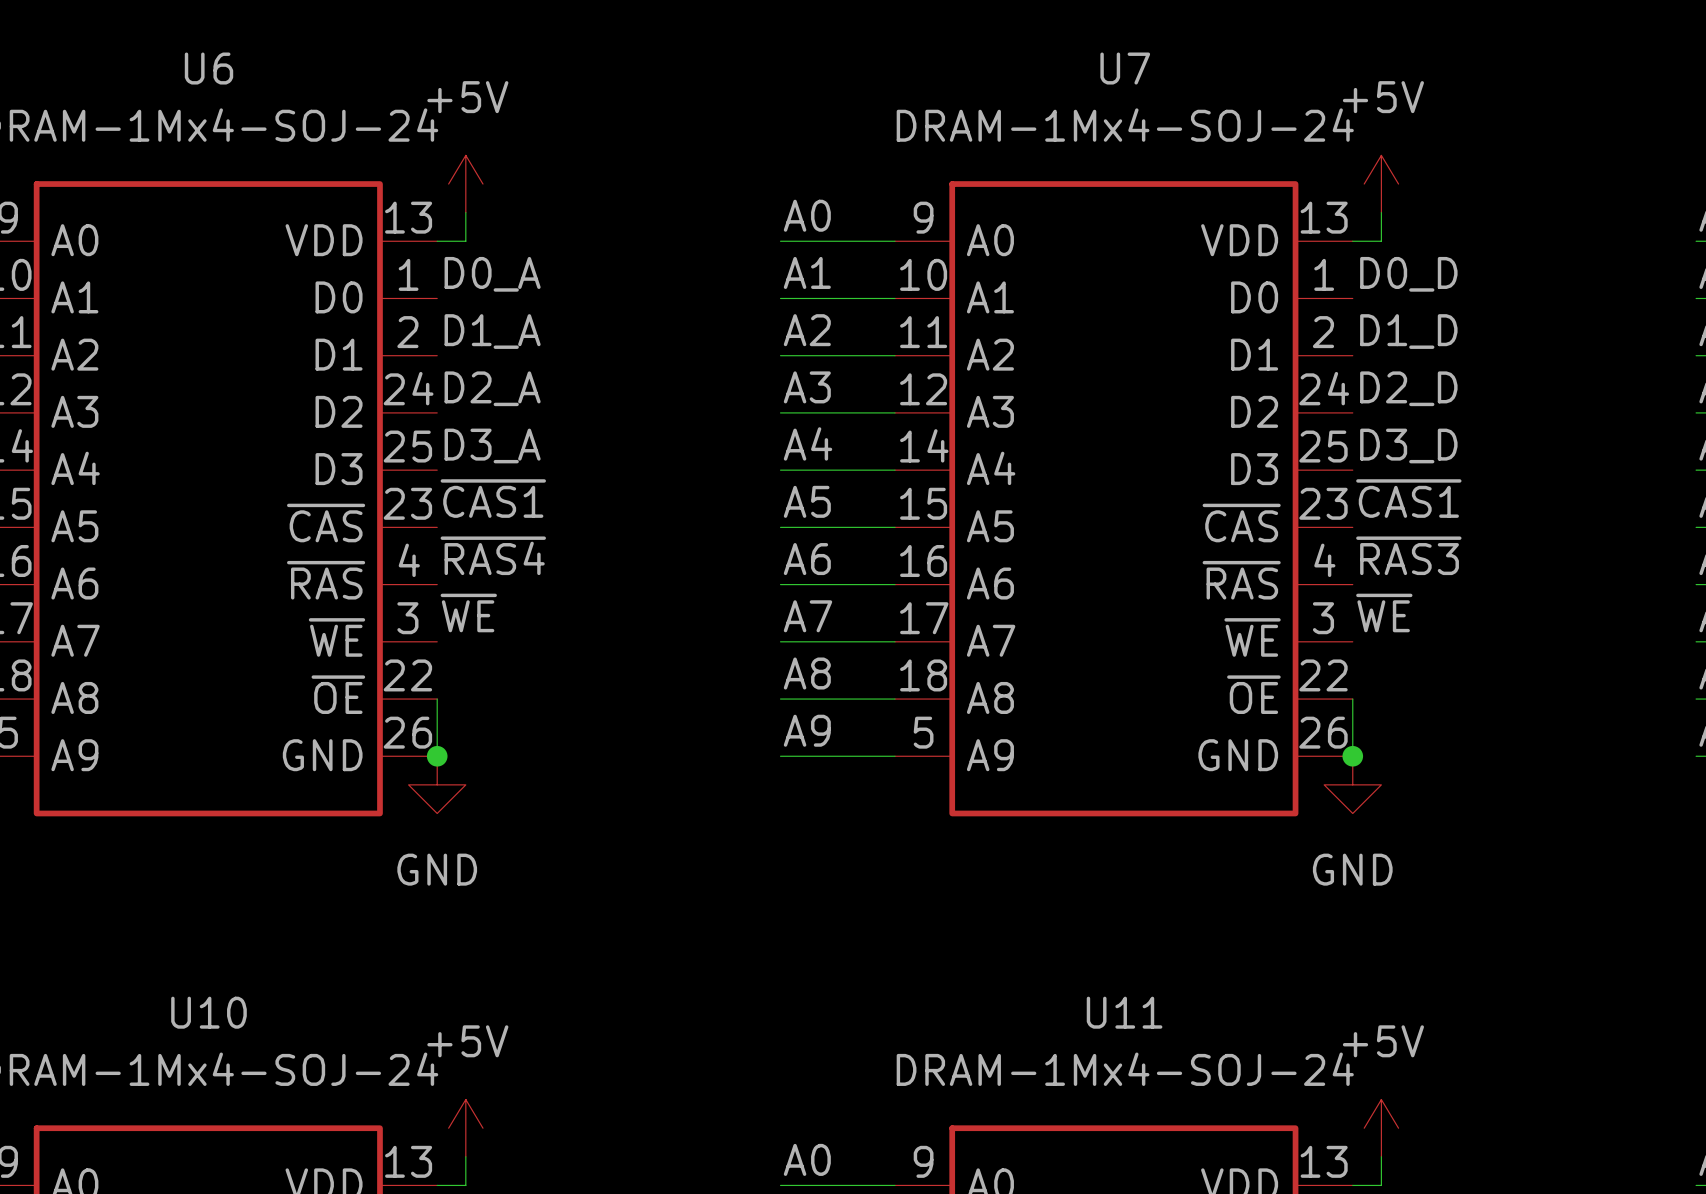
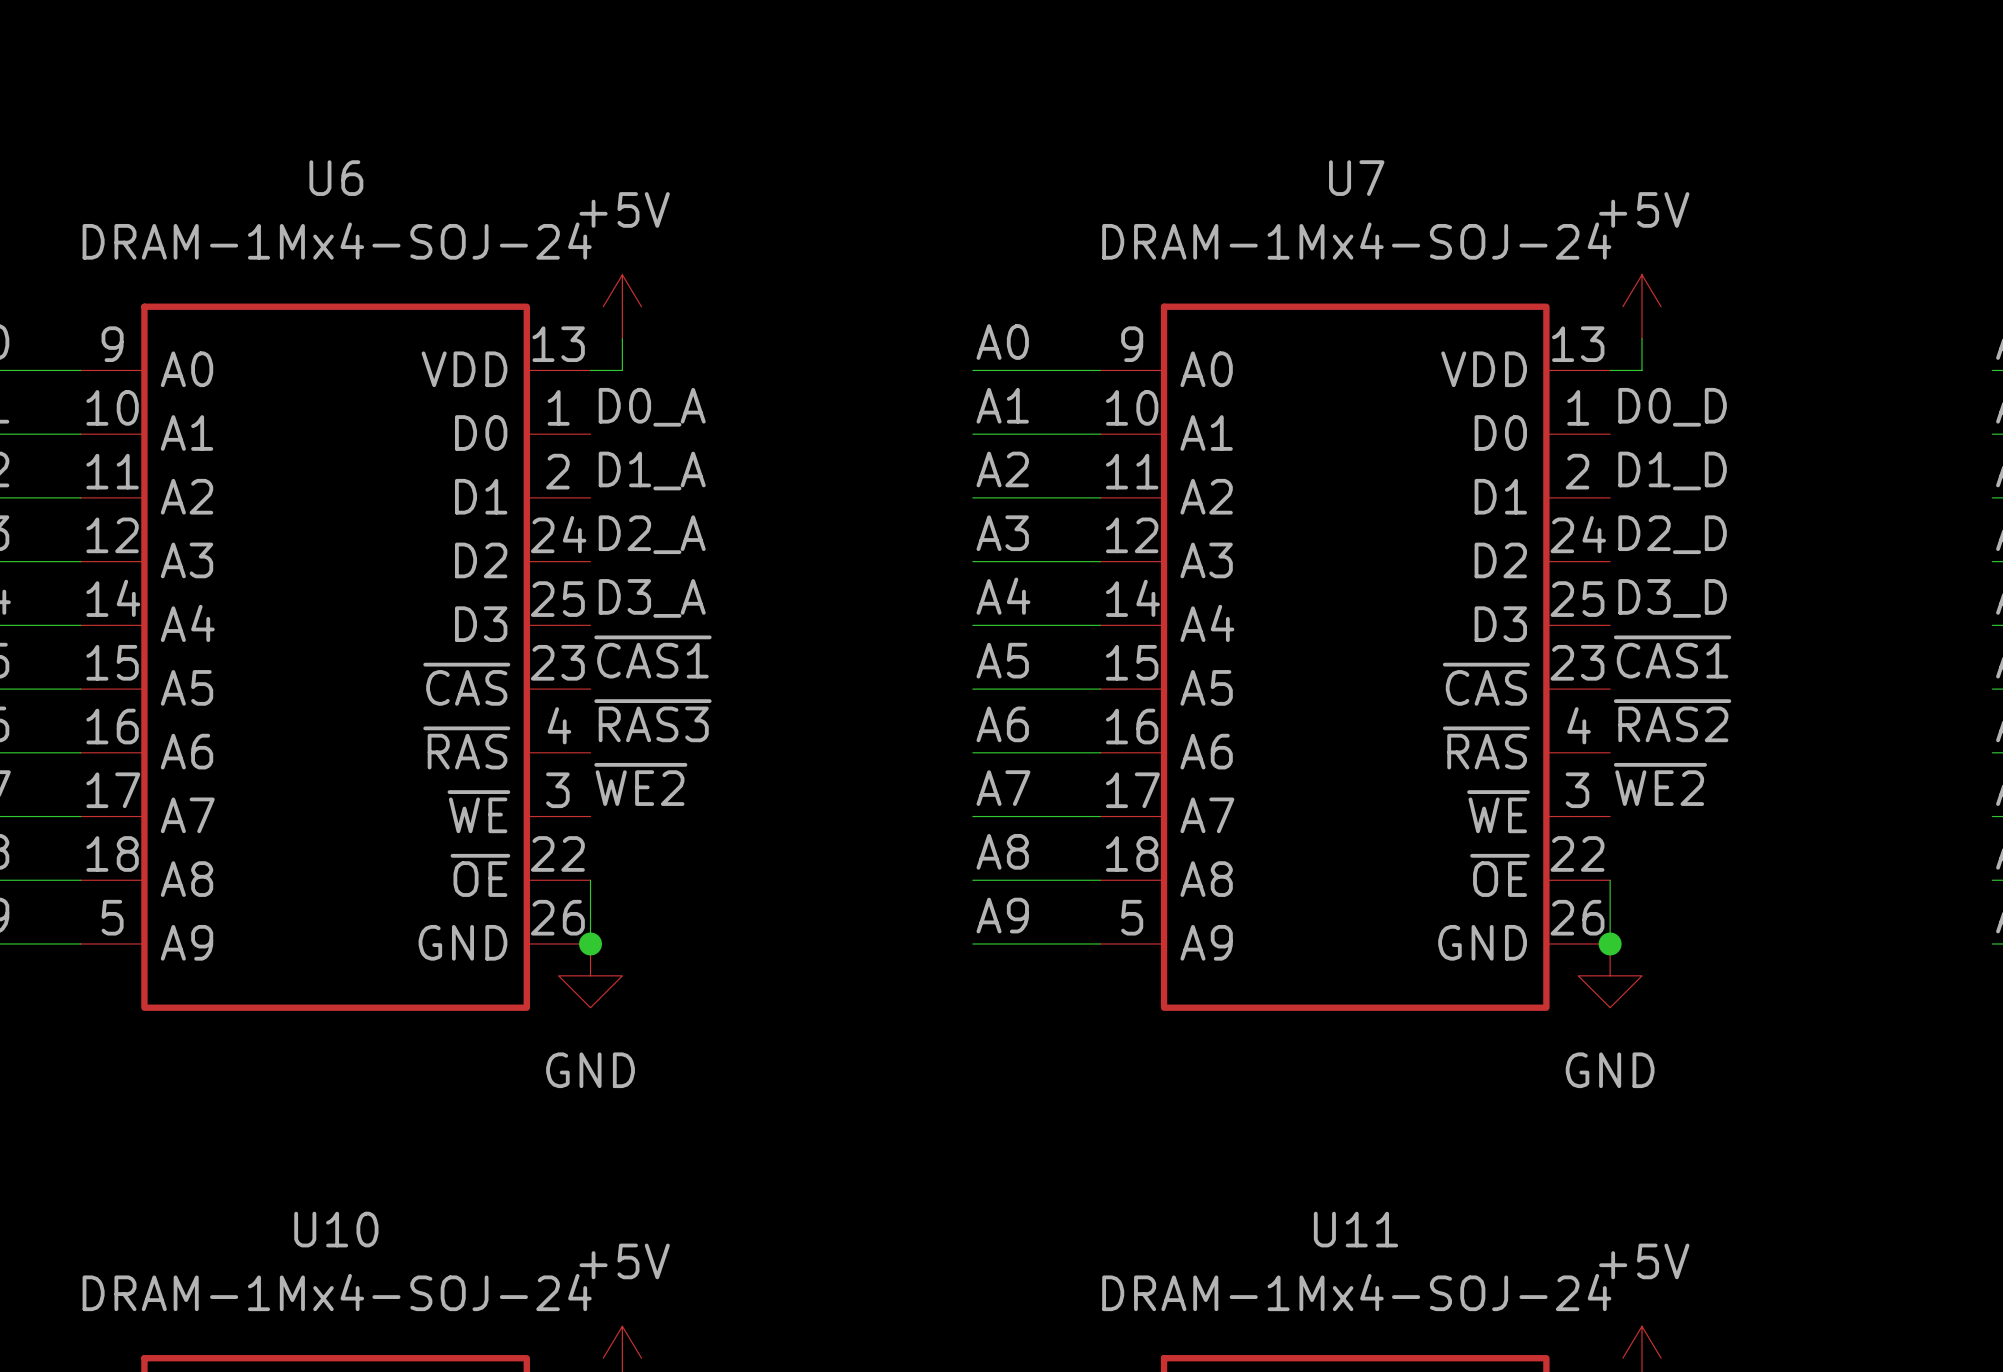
label: ~{RAS4} (493, 555) -> ~{RAS3} (652, 720)
label: ~{RAS3} (1408, 555) -> ~{RAS2} (1672, 720)
label: ~{WE} (468, 612) -> ~{WE2} (640, 784)
label: ~{WE} (1384, 612) -> ~{WE2} (1660, 784)

